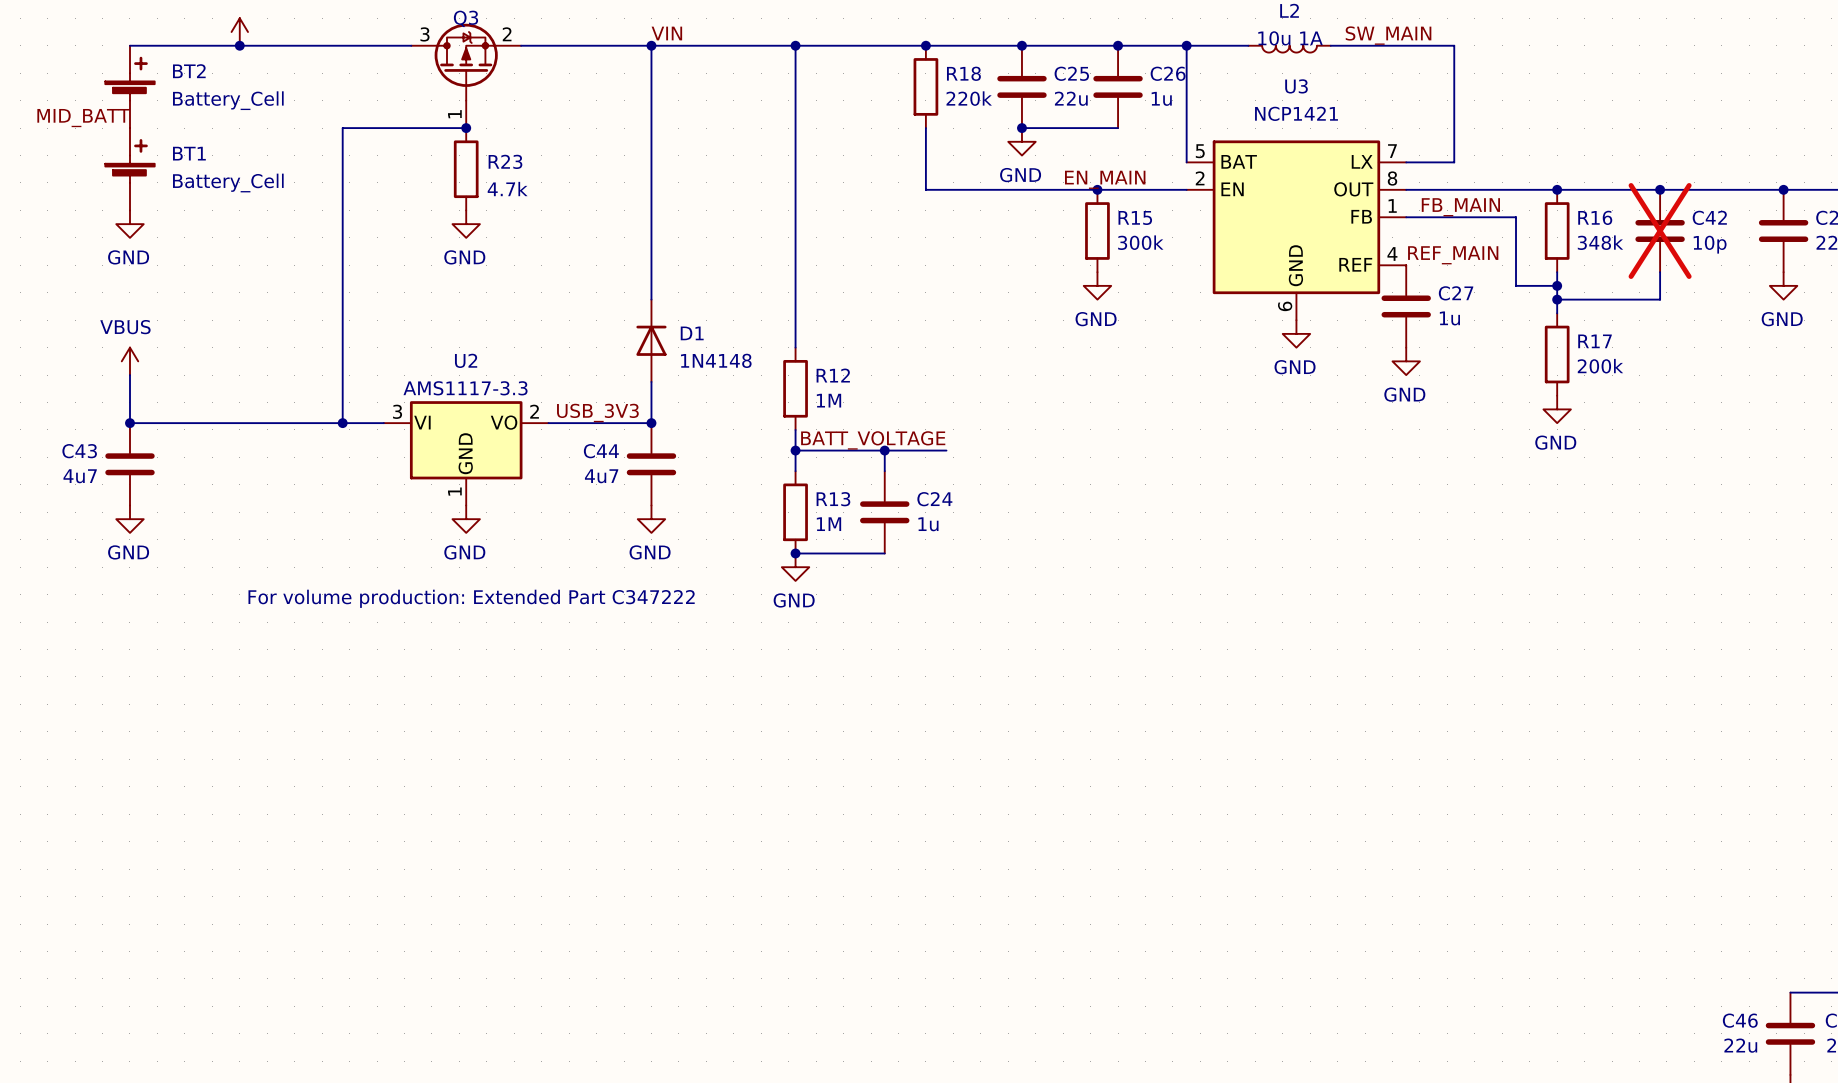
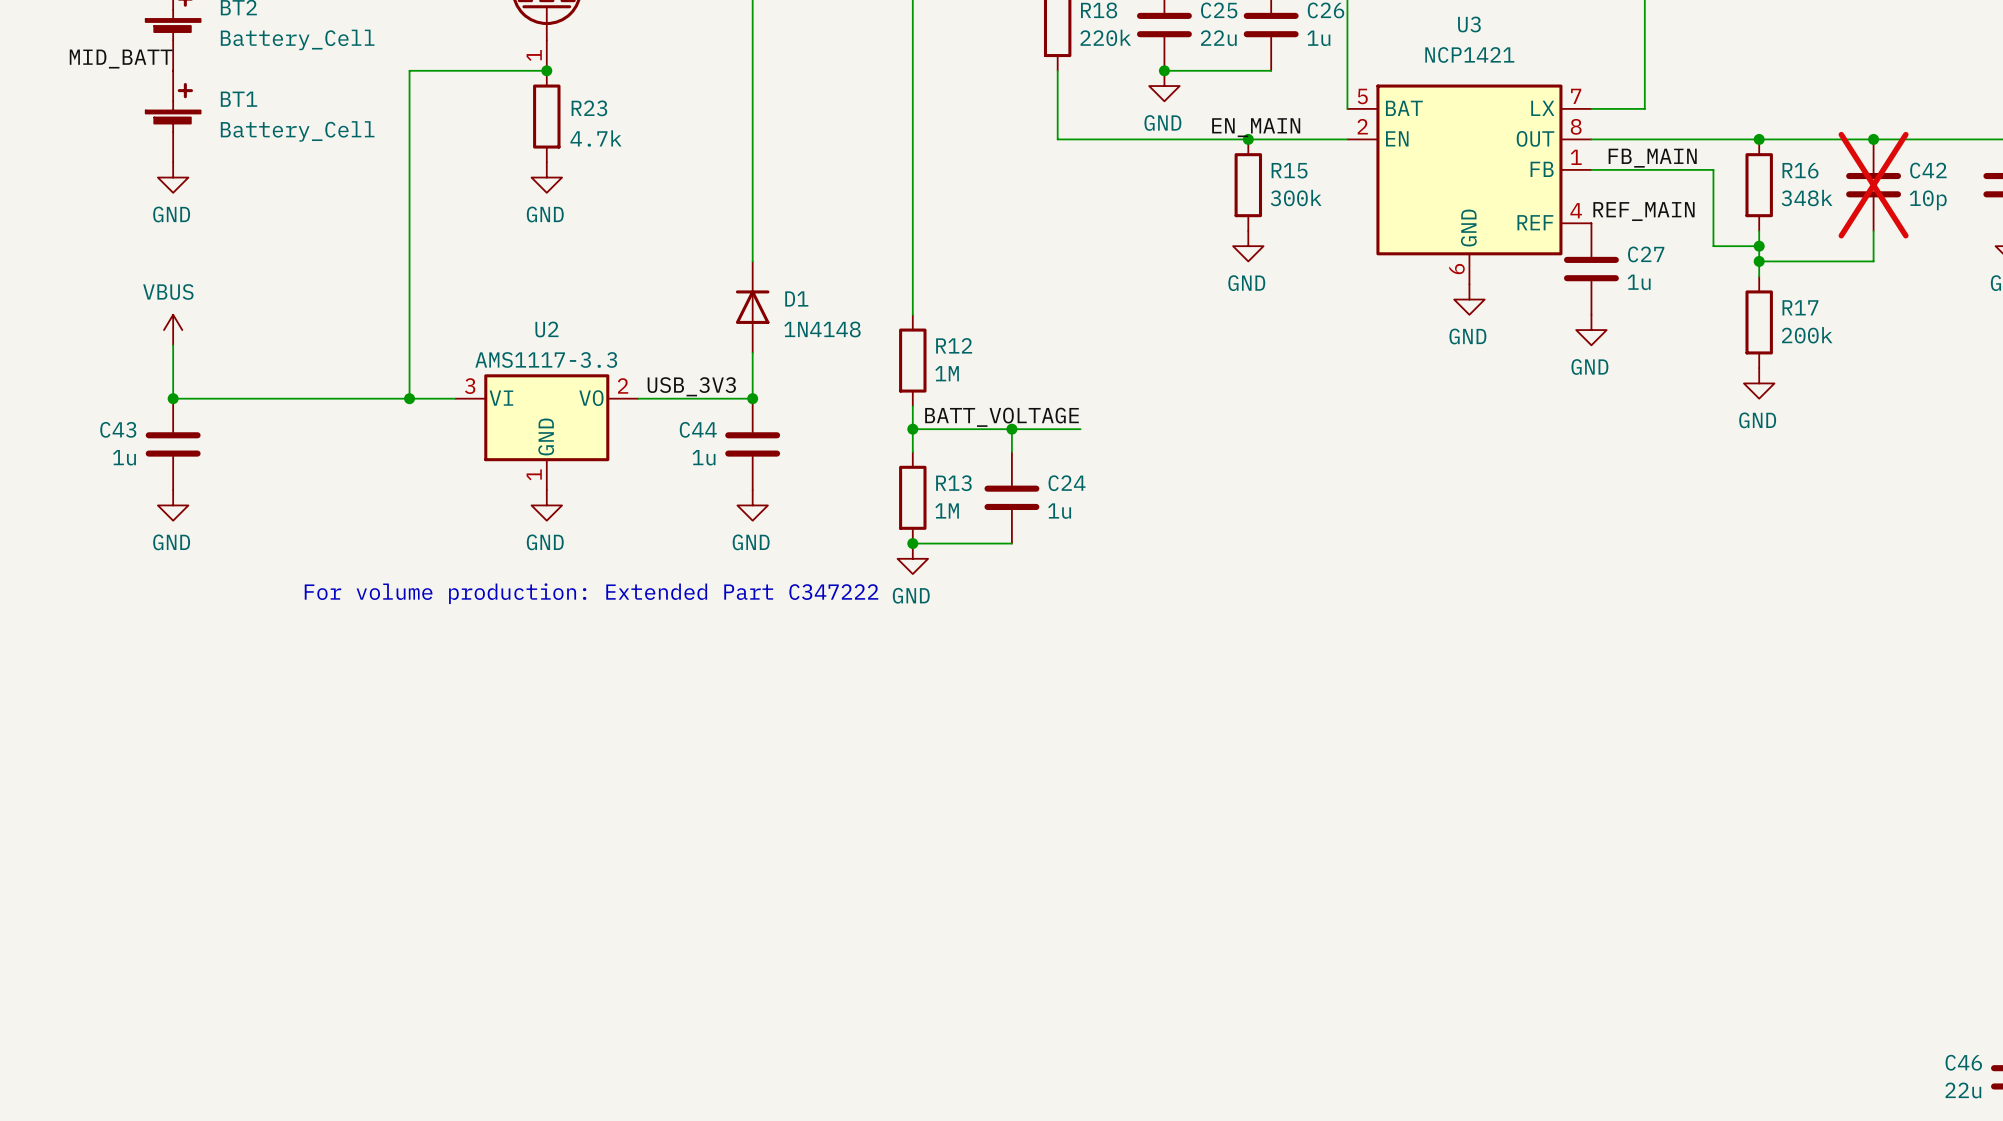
C43 value: 4u7 (80, 476) -> 1u (124, 457)
C44 value: 4u7 (601, 476) -> 1u (703, 457)

